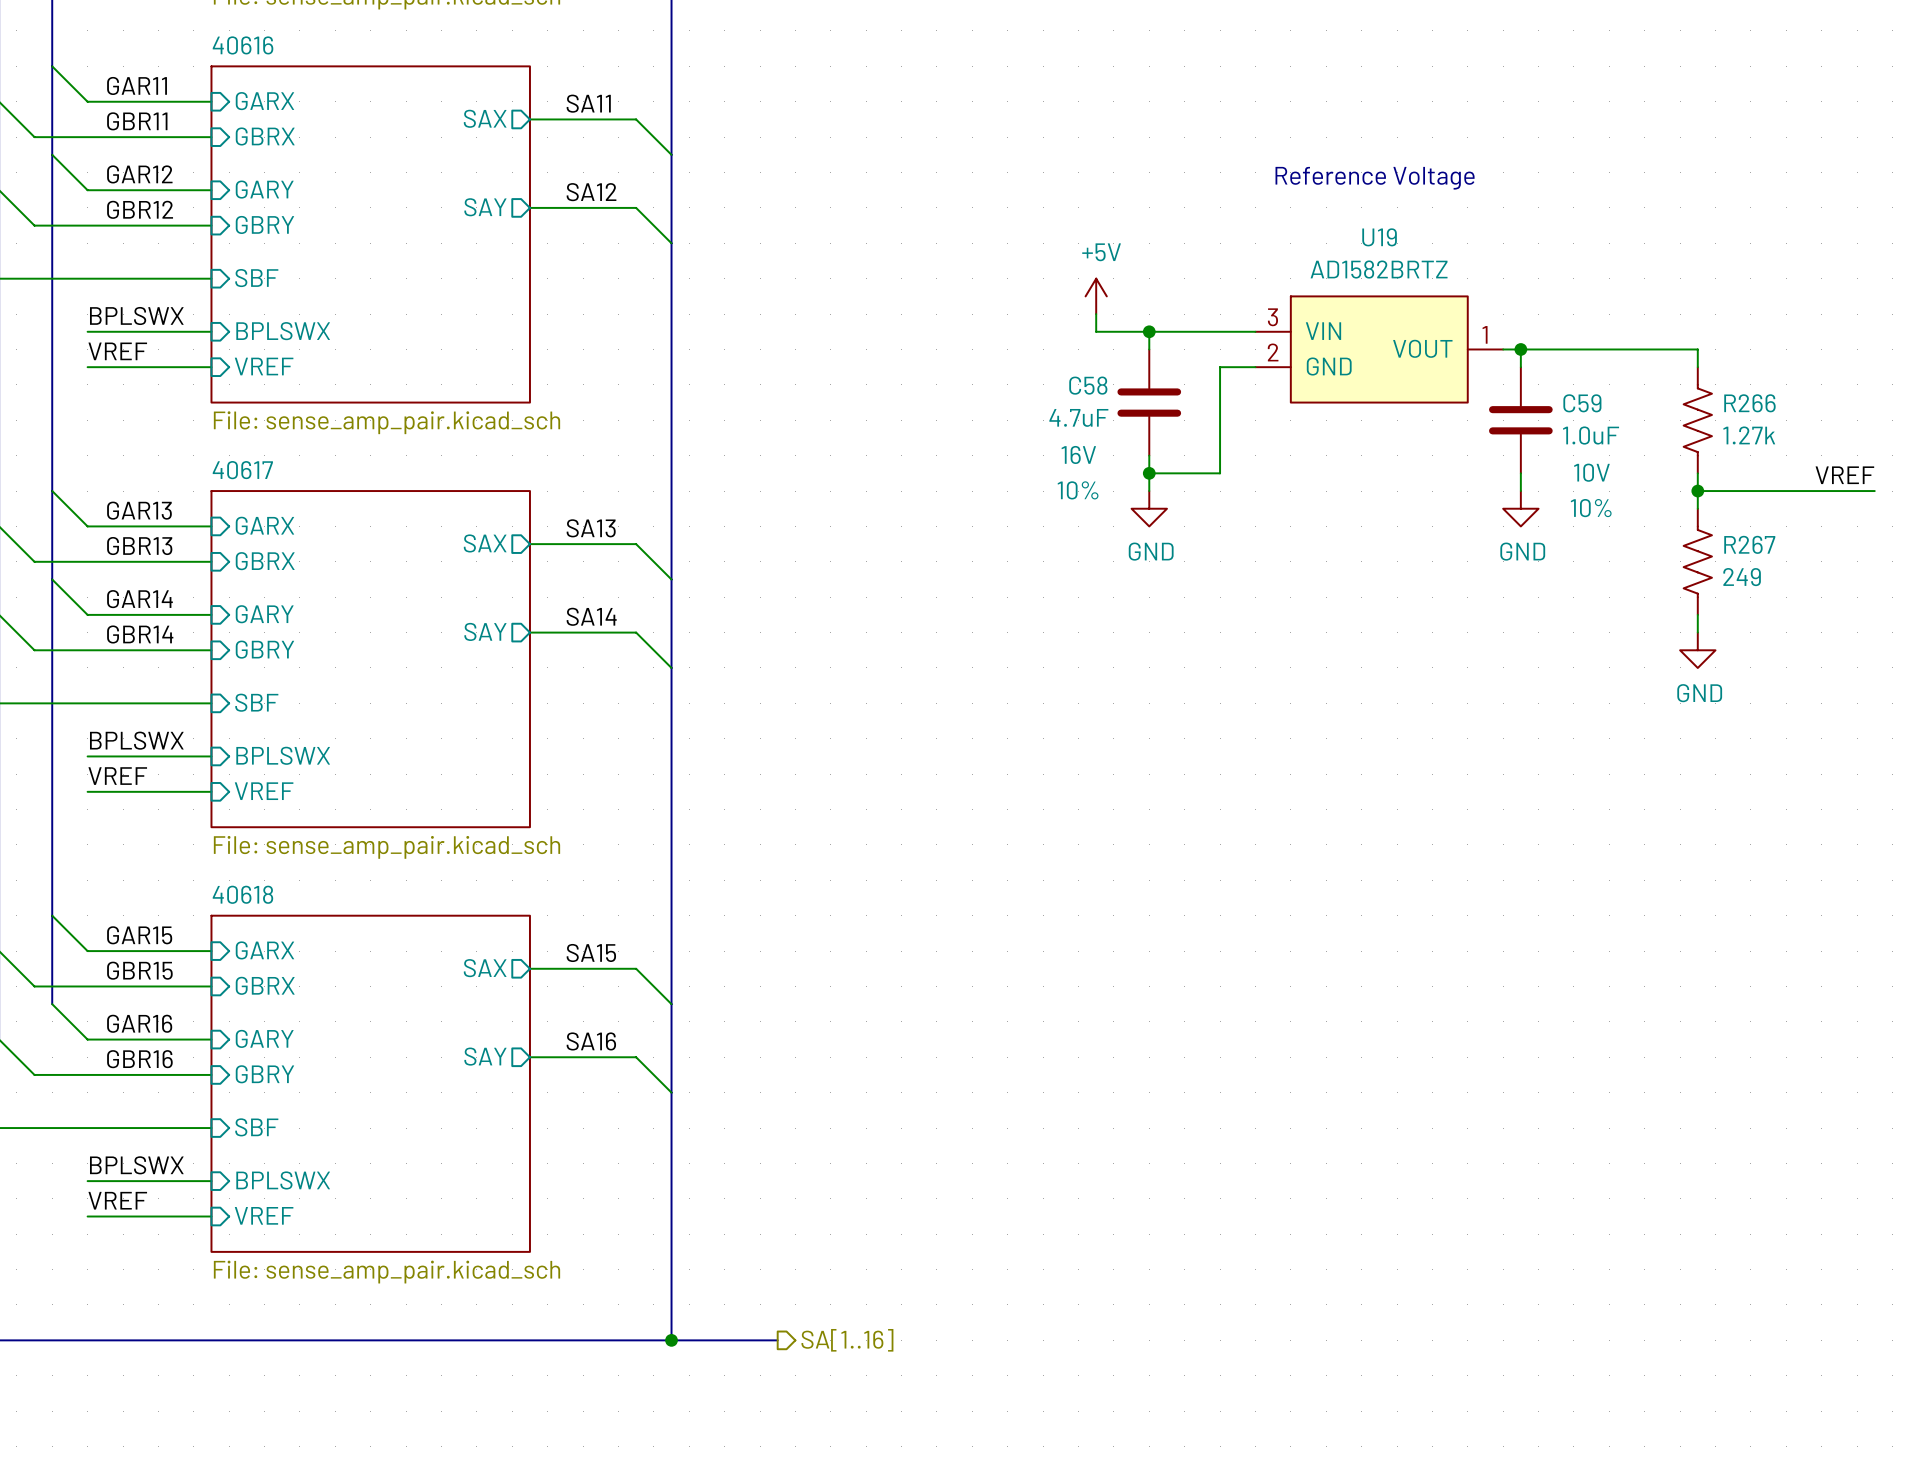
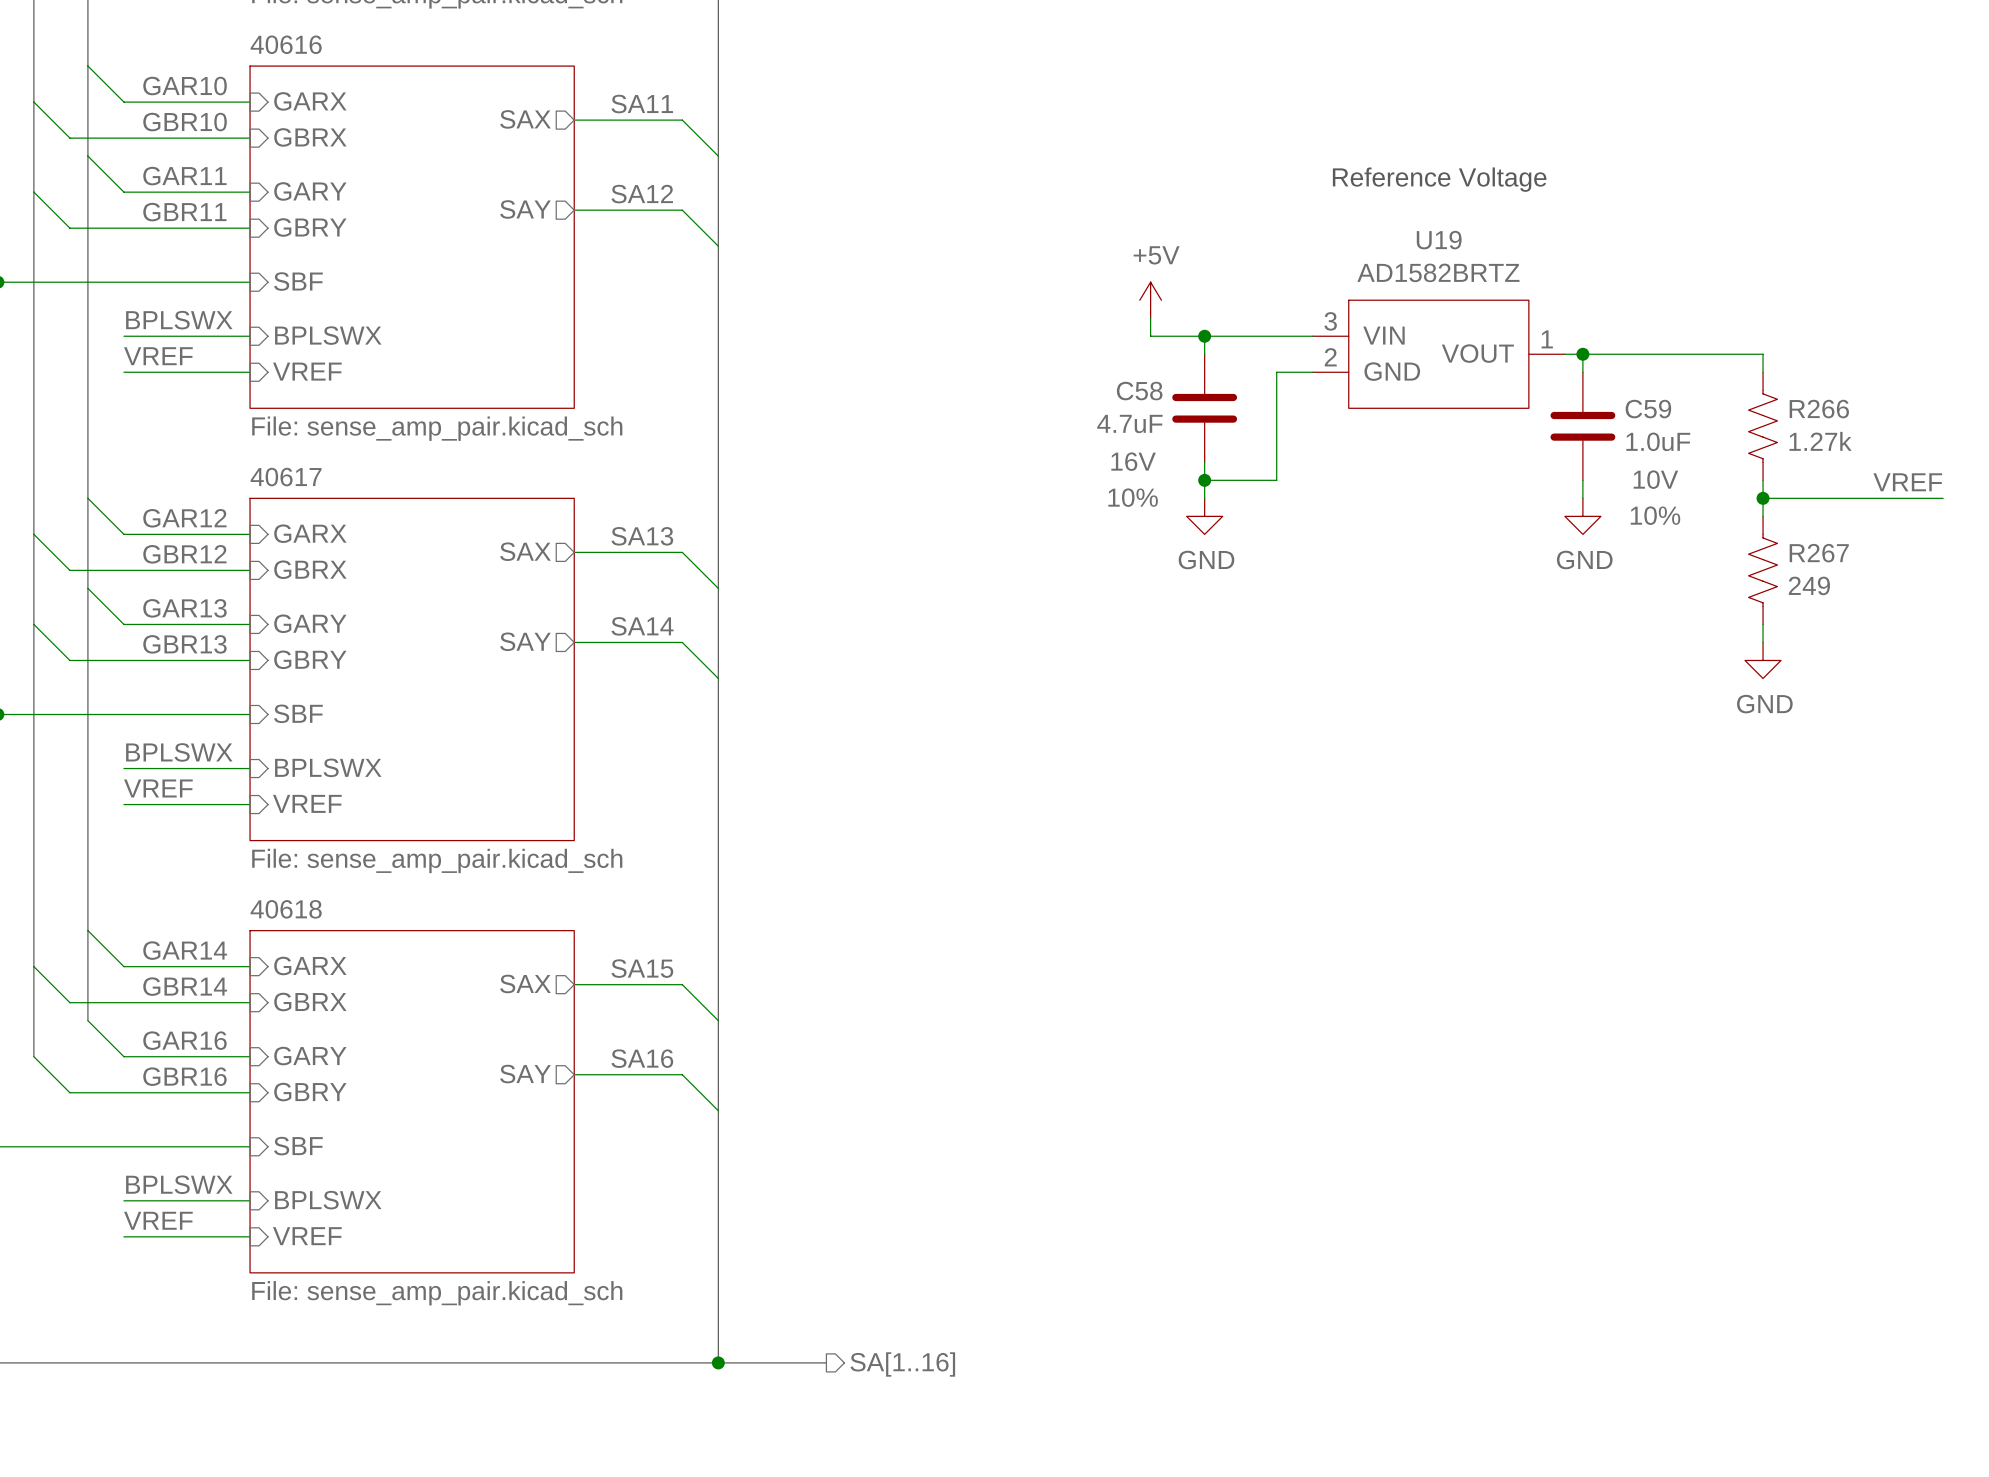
label: GAR11 (137, 85) -> GAR10 (185, 86)
label: GBR11 (137, 121) -> GBR10 (185, 122)
label: GAR12 (139, 174) -> GAR11 (184, 176)
label: GBR12 (140, 209) -> GBR11 (184, 212)
label: GAR13 (139, 510) -> GAR12 (184, 518)
label: GBR13 (139, 546) -> GBR12 (184, 554)
label: GAR14 (139, 599) -> GAR13 (184, 608)
label: GBR14 (140, 634) -> GBR13 (184, 644)
label: GAR15 (139, 935) -> GAR14 (185, 950)
label: GBR15 (139, 970) -> GBR14 (185, 986)

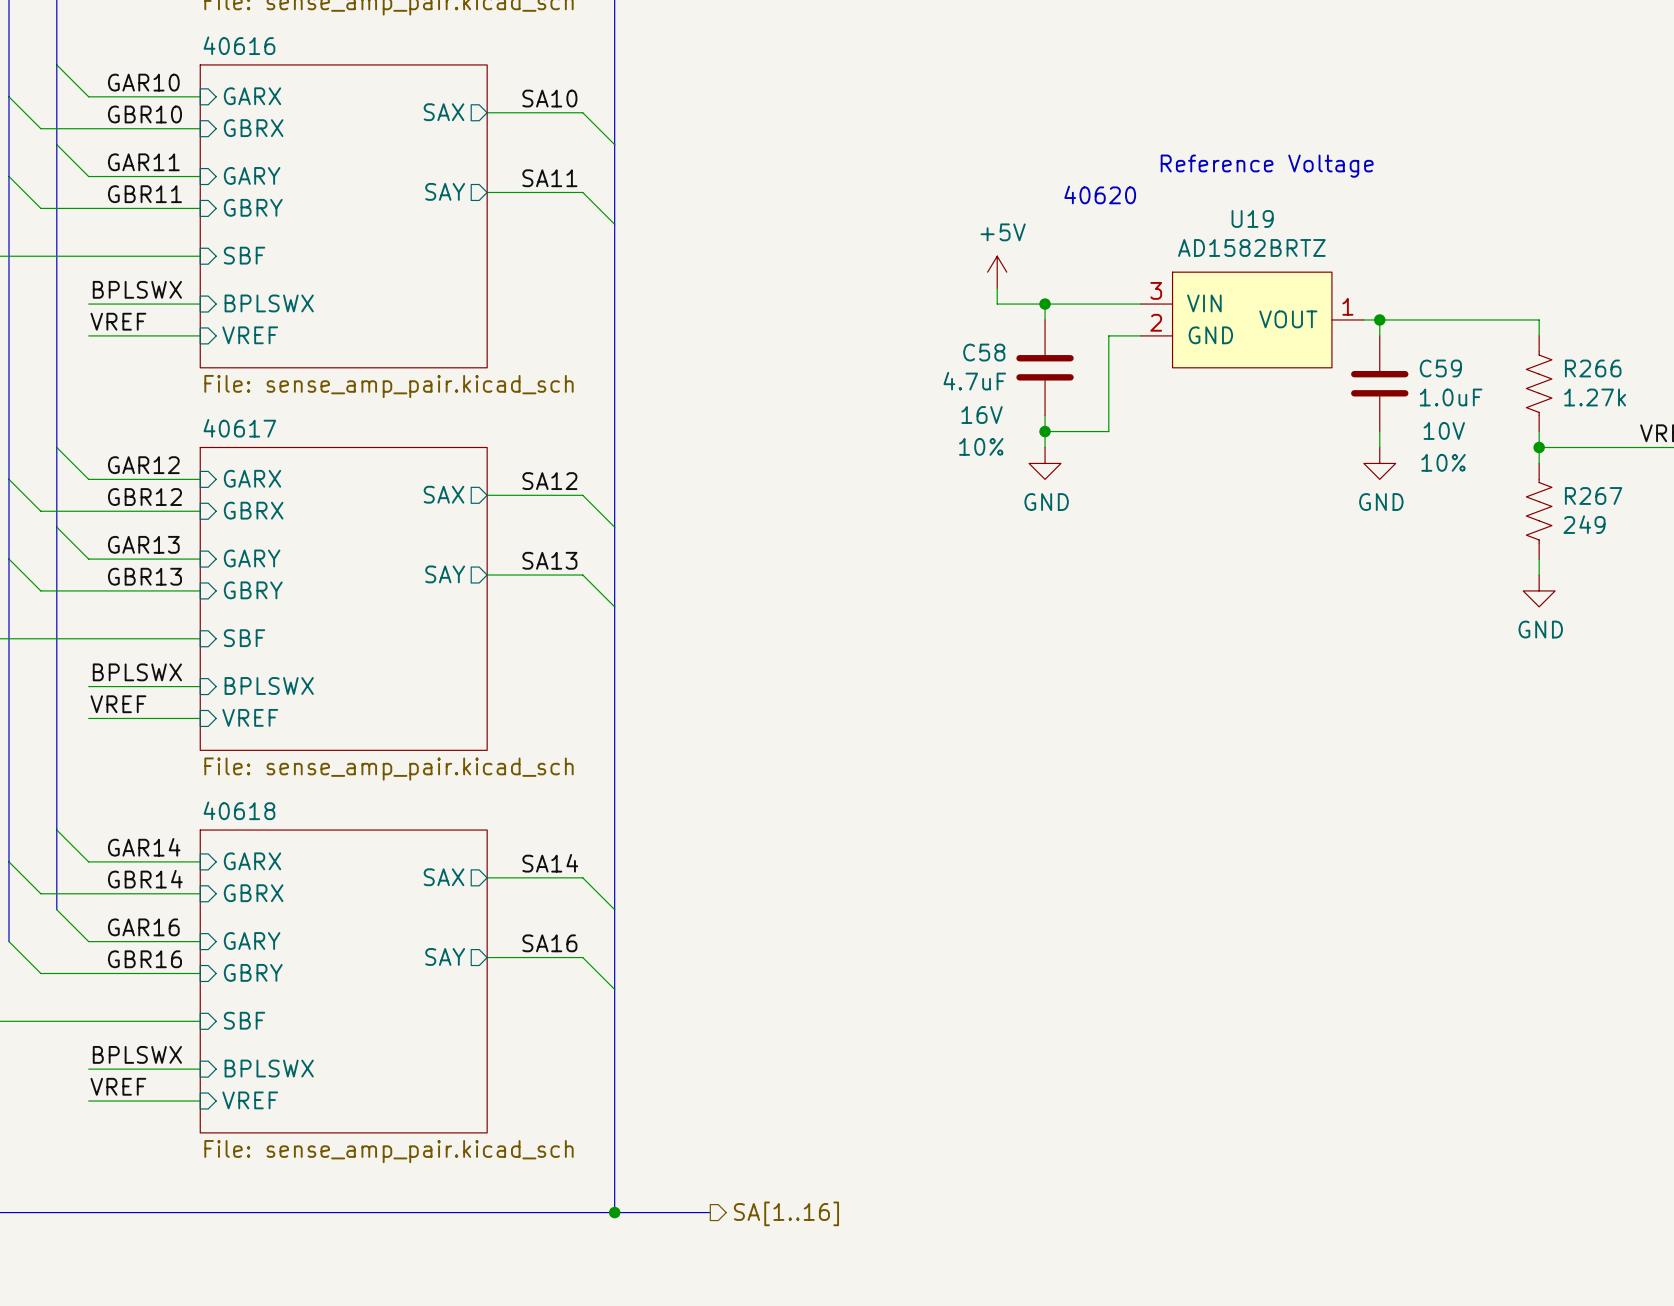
label: SA11 (642, 104) -> SA10 (549, 98)
label: SA12 (642, 194) -> SA11 (549, 178)
text: none -> 40620 (1100, 194)
label: SA13 (642, 536) -> SA12 (549, 481)
label: SA14 (642, 626) -> SA13 (549, 560)
label: SA15 (642, 968) -> SA14 (550, 863)

